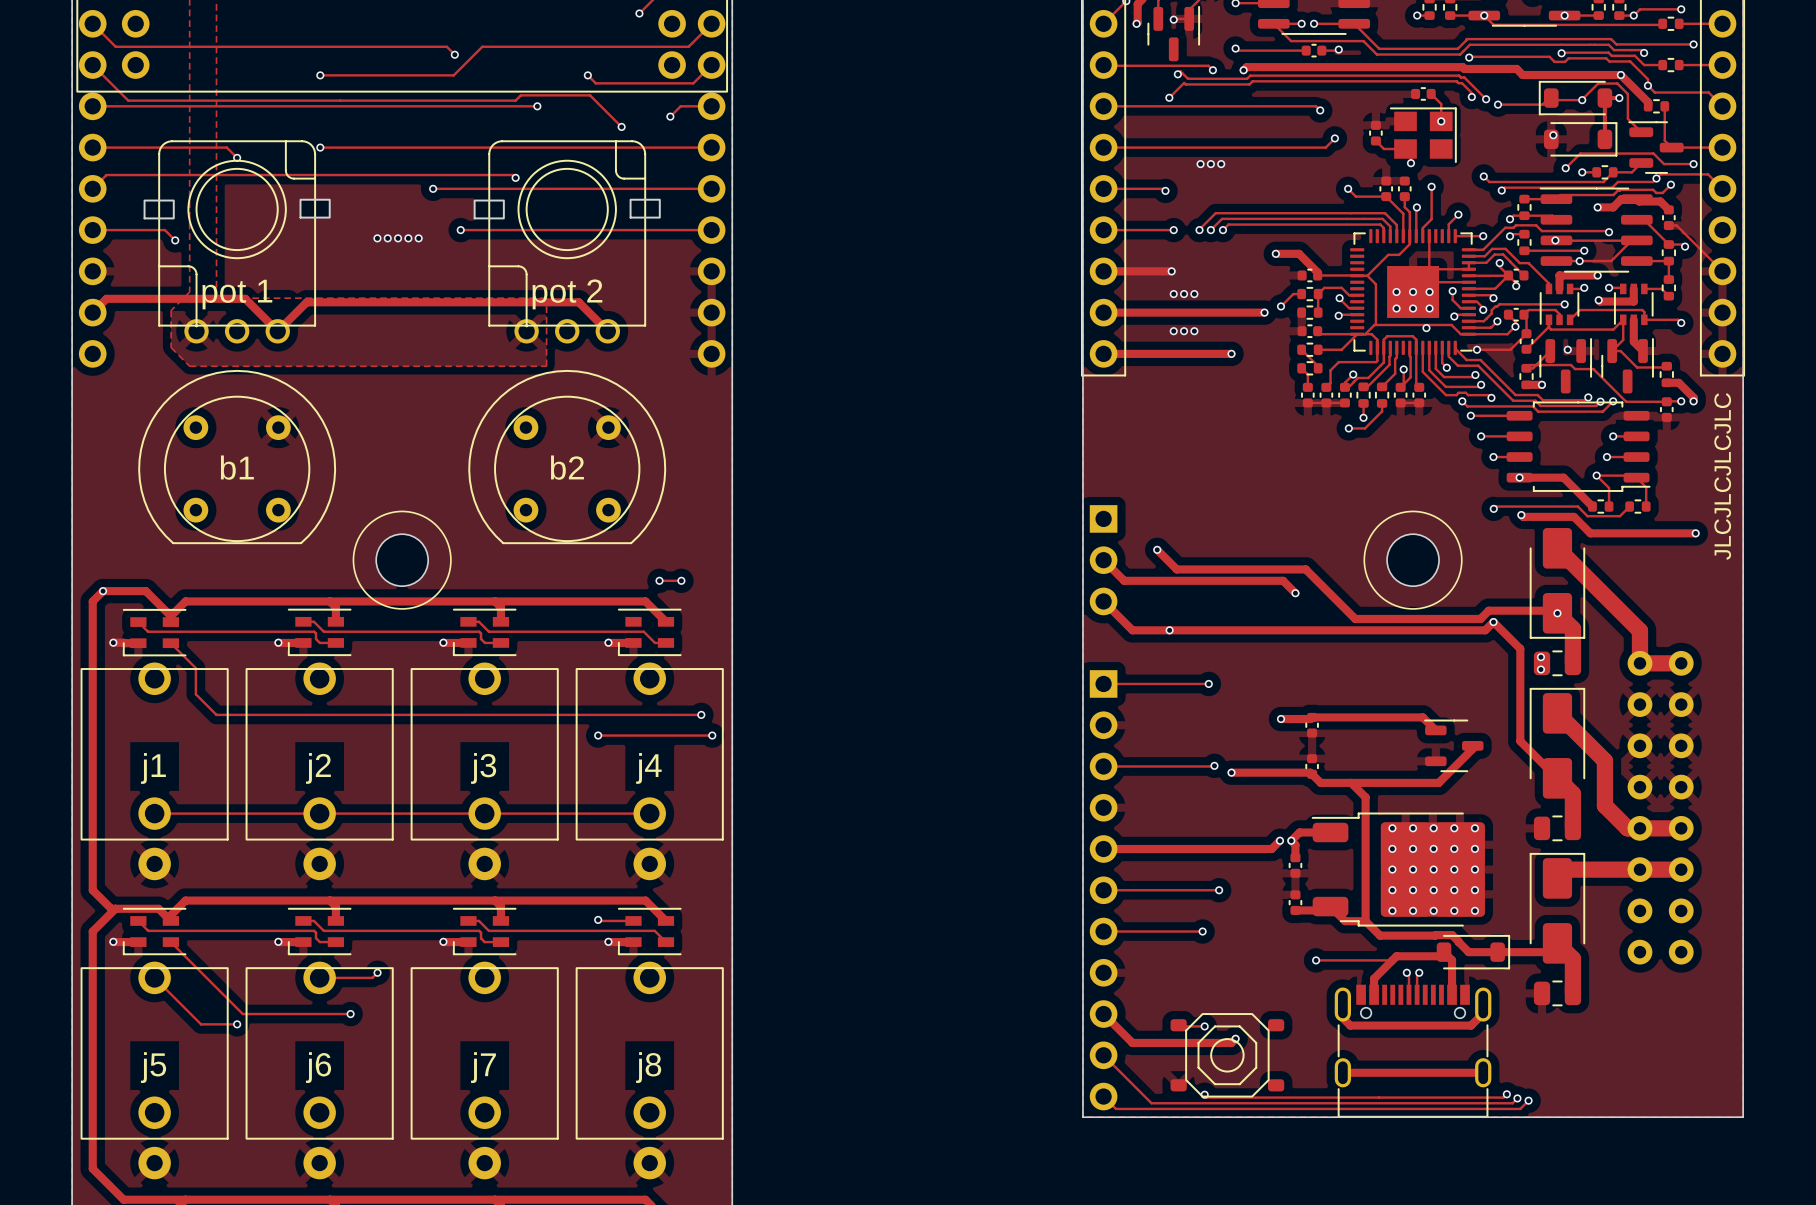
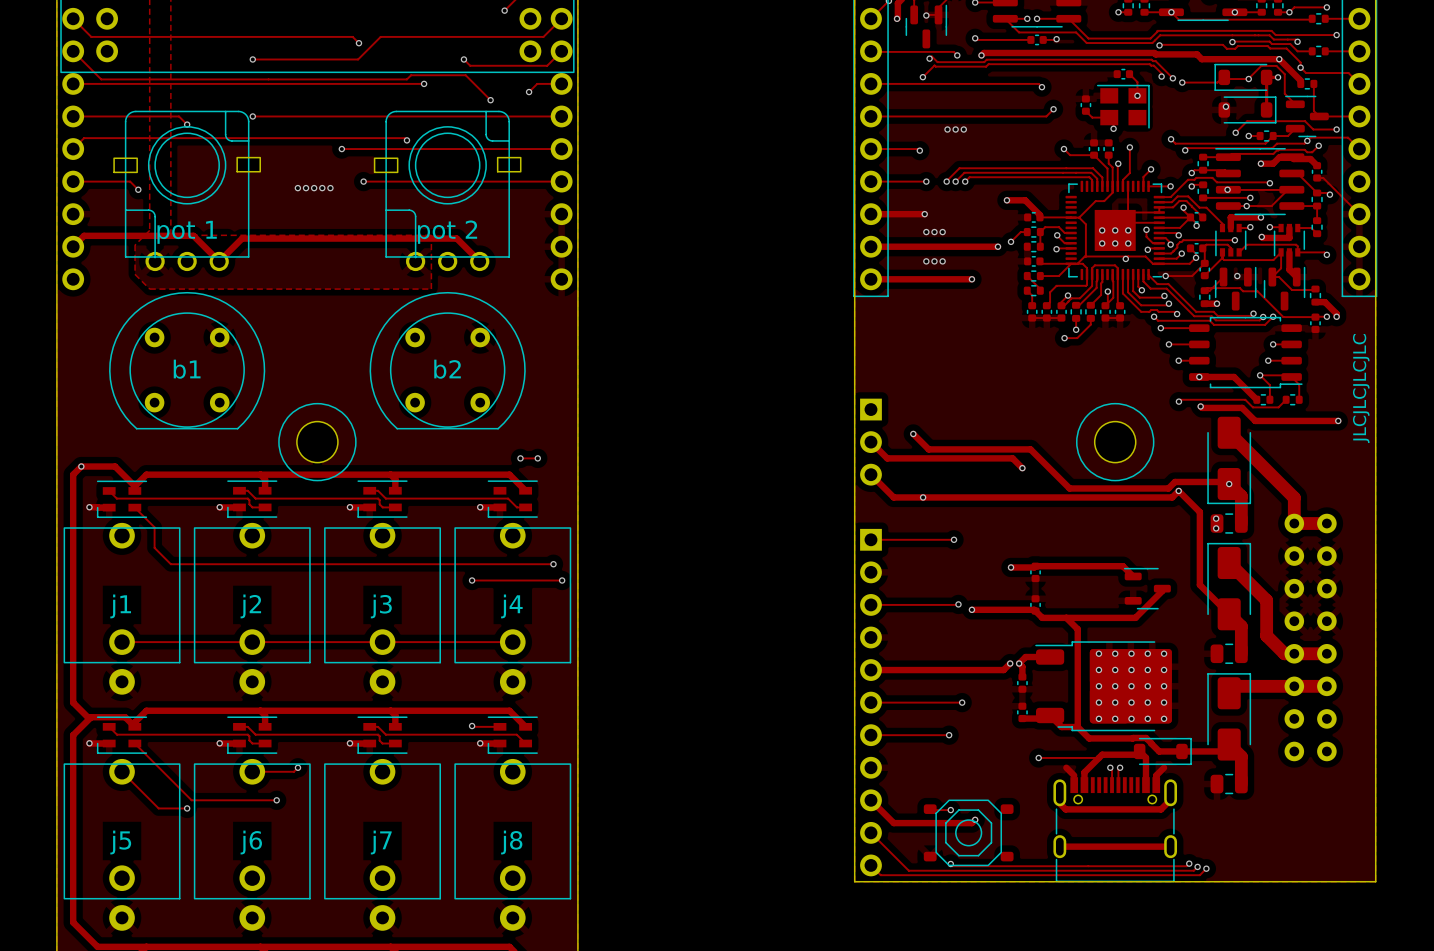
track: none -> (1066, 767) (1074, 775)
track: none -> (1164, 767) (1156, 775) (1156, 785)

